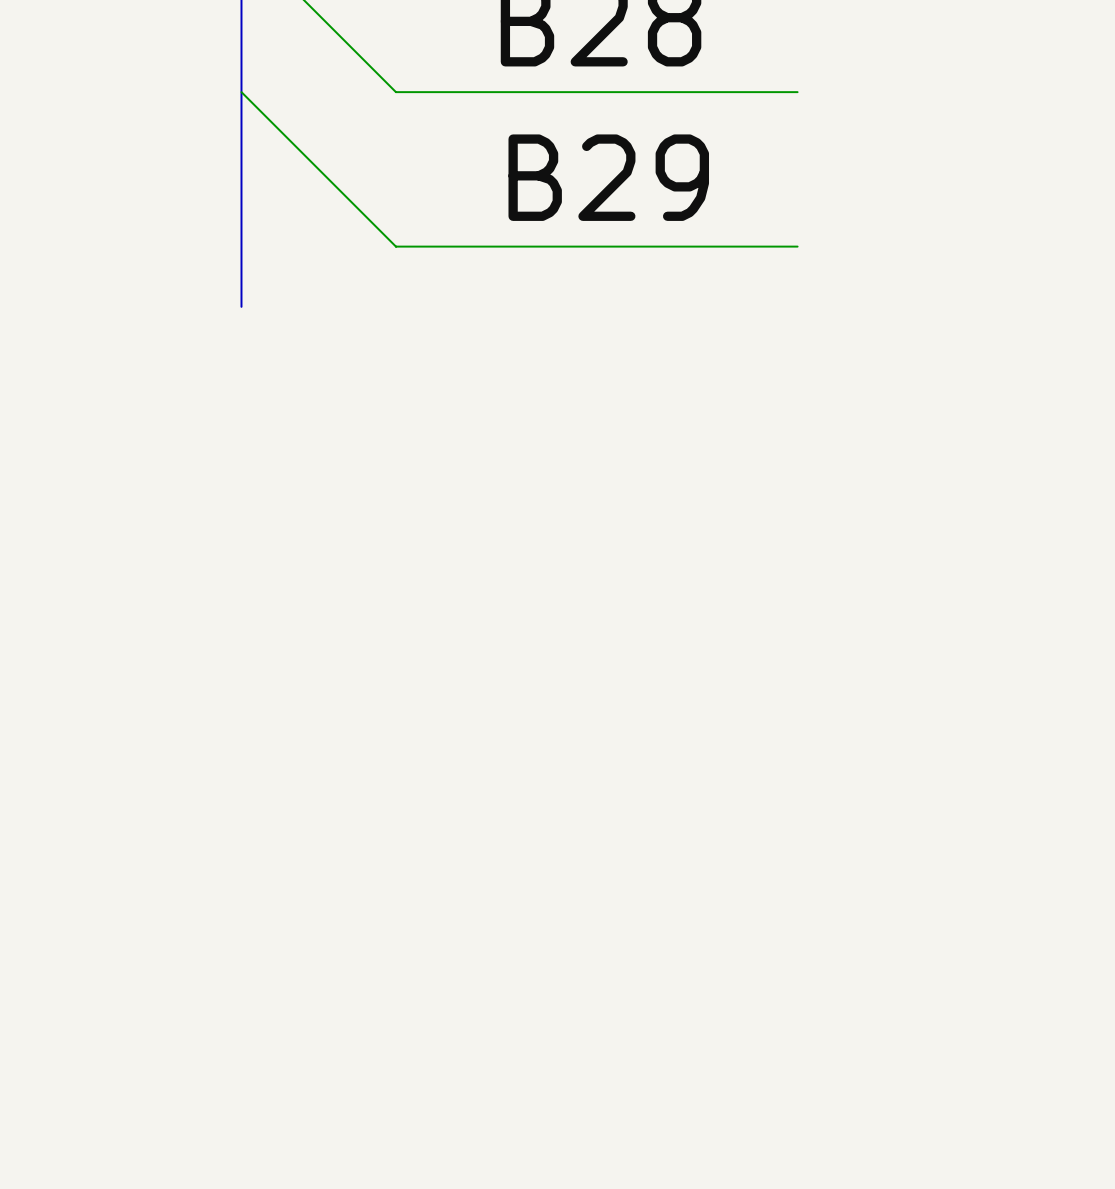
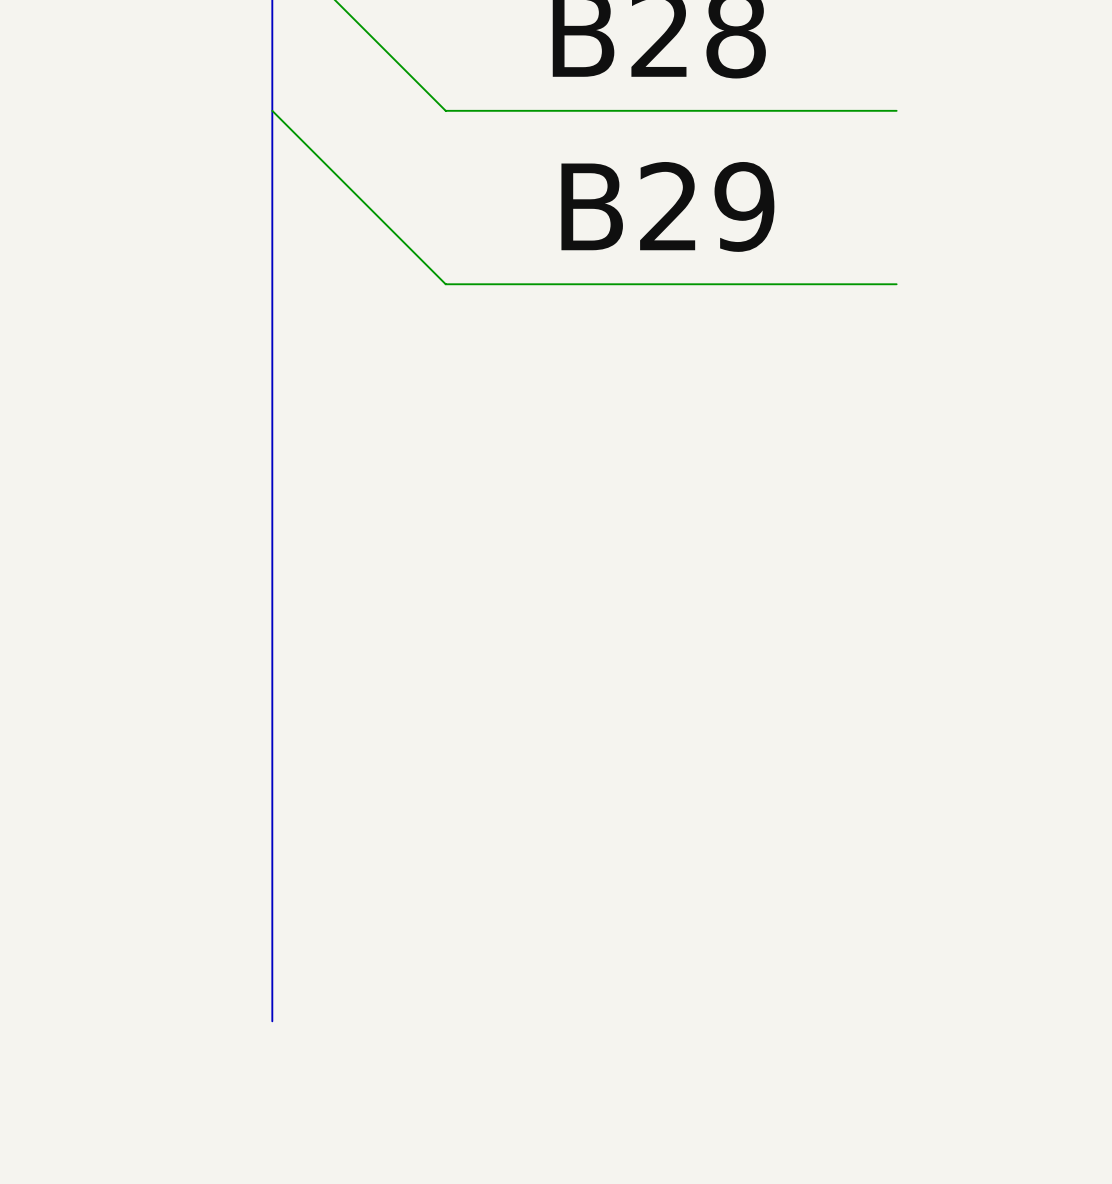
bus: none -> (272, 351) (272, 1021)

